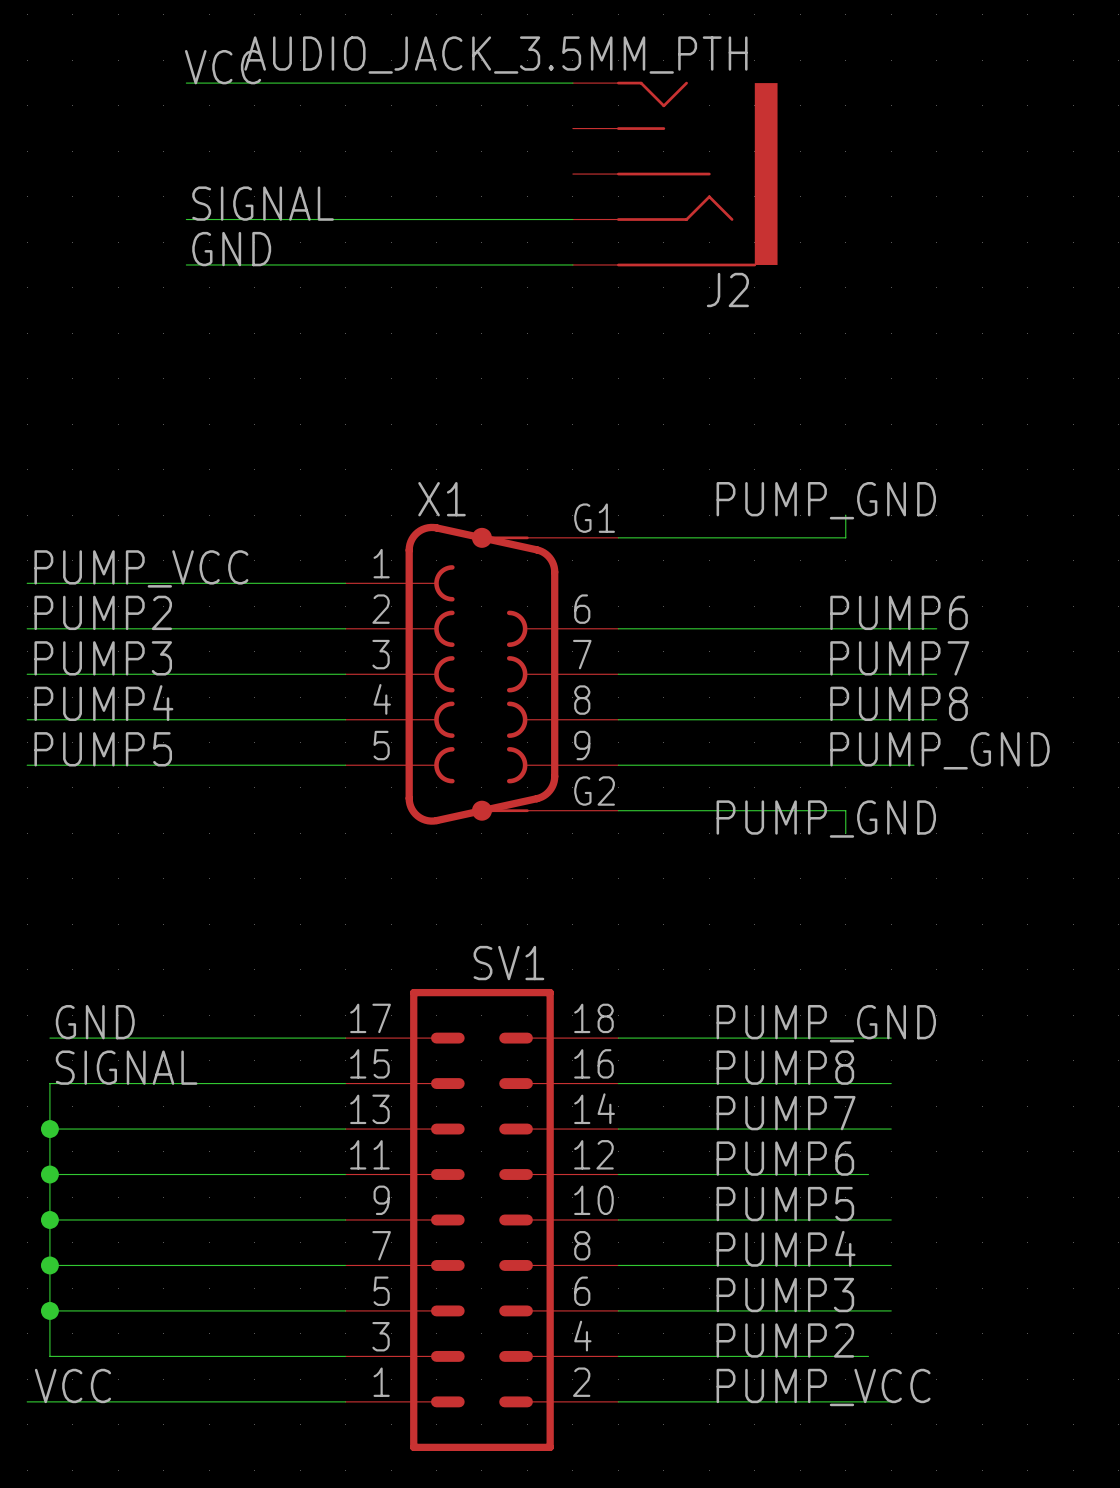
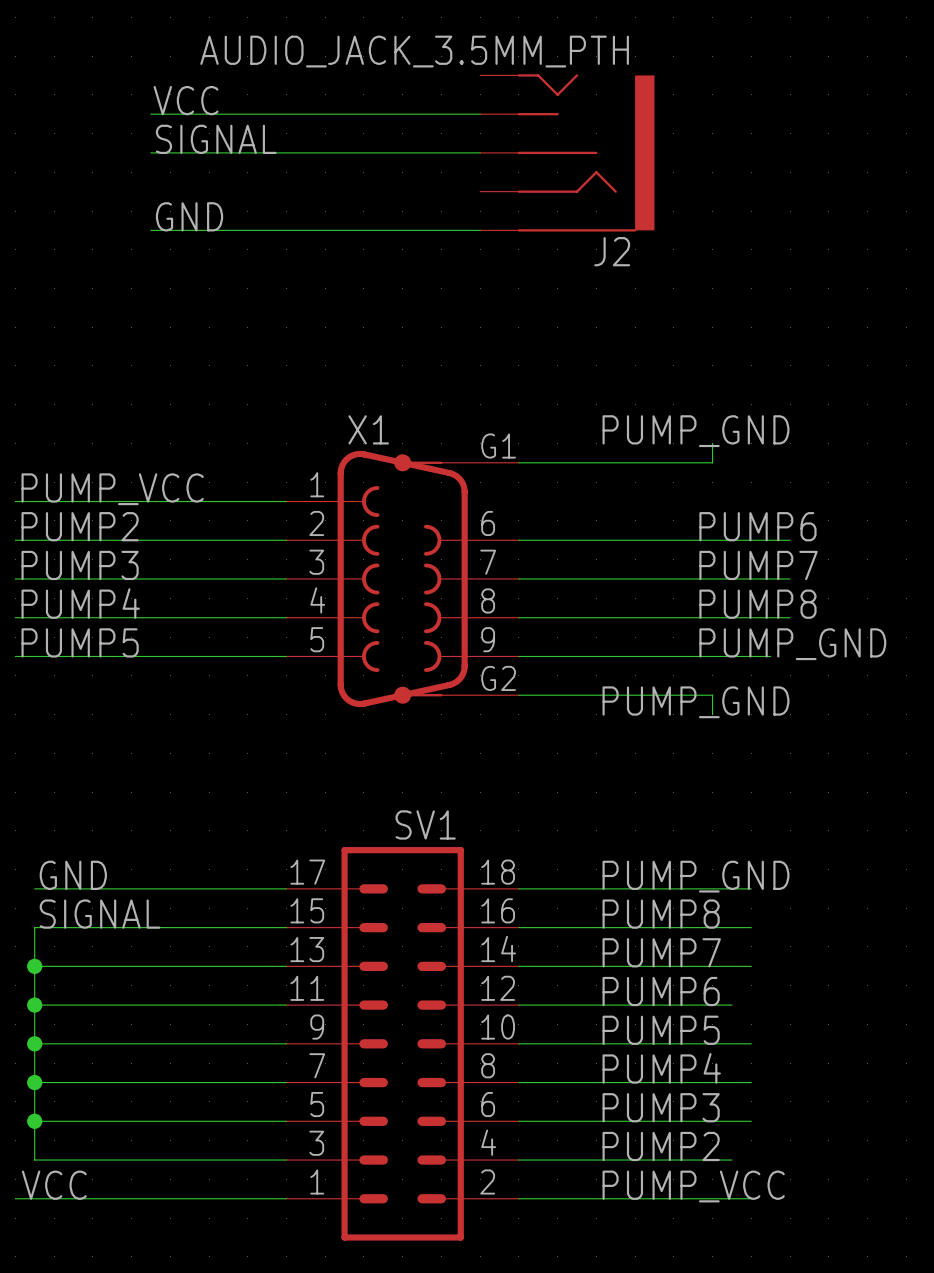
label position: VCC (223, 67) -> VCC (186, 100)
wire: (186, 83) (572, 83) -> (150, 114) (480, 114)
label position: SIGNAL (263, 203) -> SIGNAL (216, 139)
wire: (186, 219) (572, 219) -> (150, 152) (480, 152)

